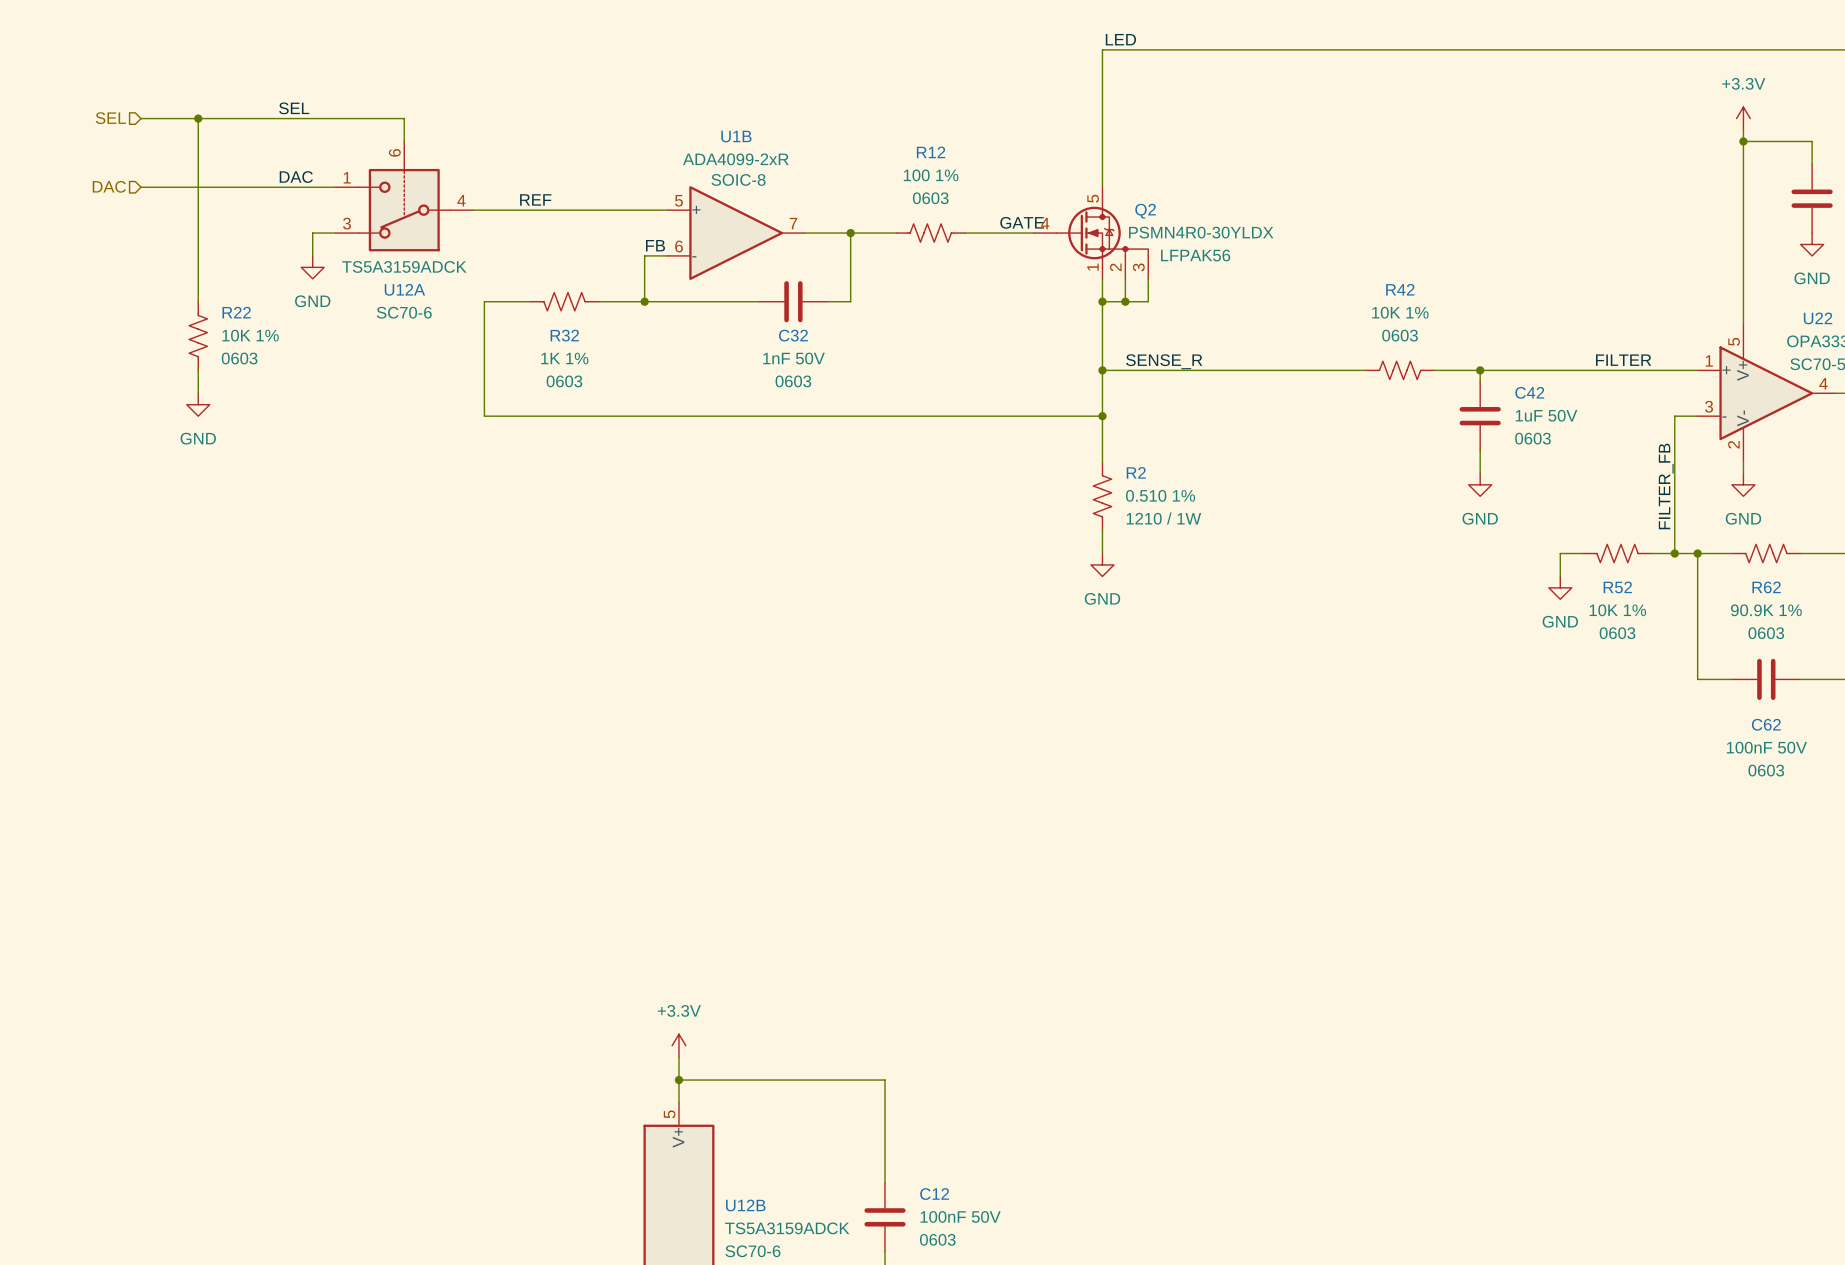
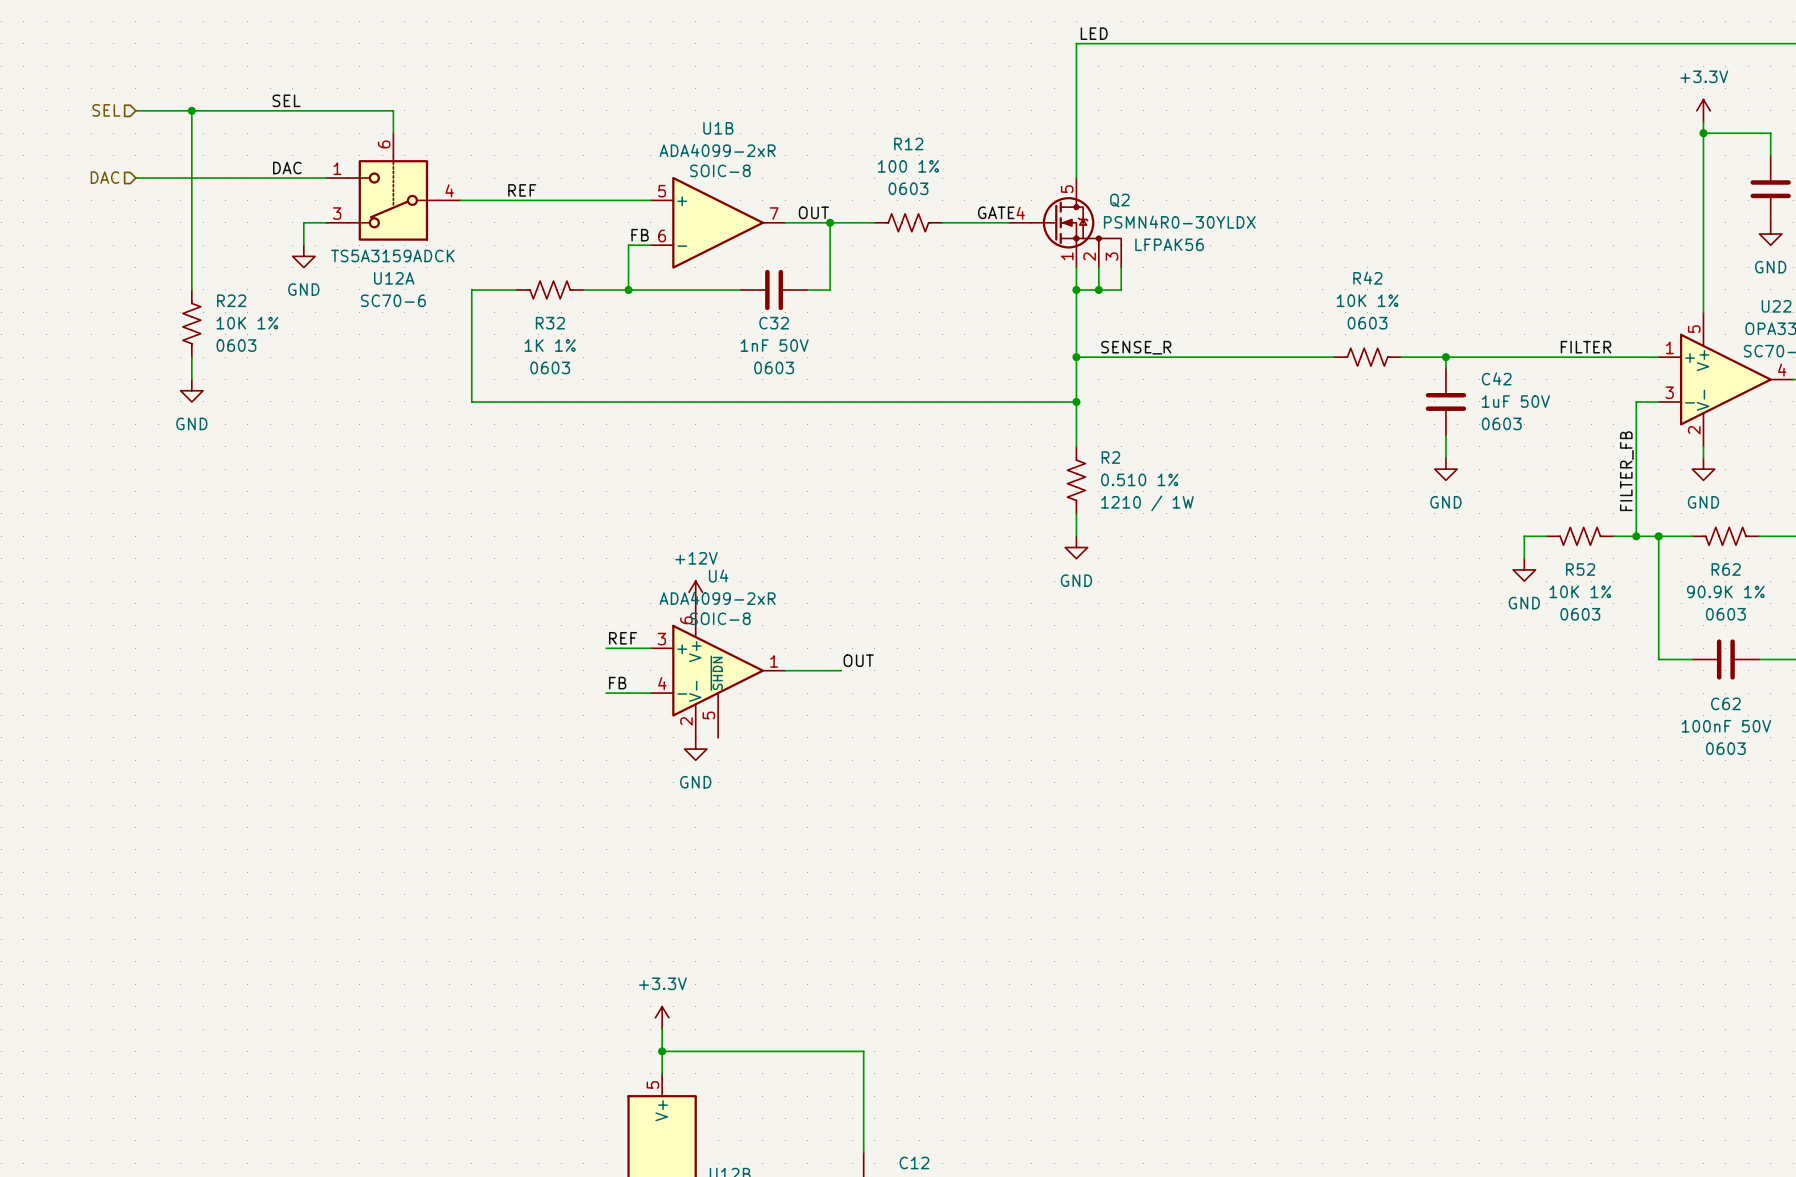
label: none -> OUT (813, 212)
power symbol: none -> +12V (695, 592)
label: none -> REF (623, 638)
wire: none -> (606, 648) (650, 648)
label: none -> OUT (858, 660)
U4: none -> ADA4099-2xR (718, 670)
wire: none -> (785, 670) (841, 670)
label: none -> FB (617, 683)
wire: none -> (606, 693) (650, 693)
power symbol: none -> GND (695, 749)

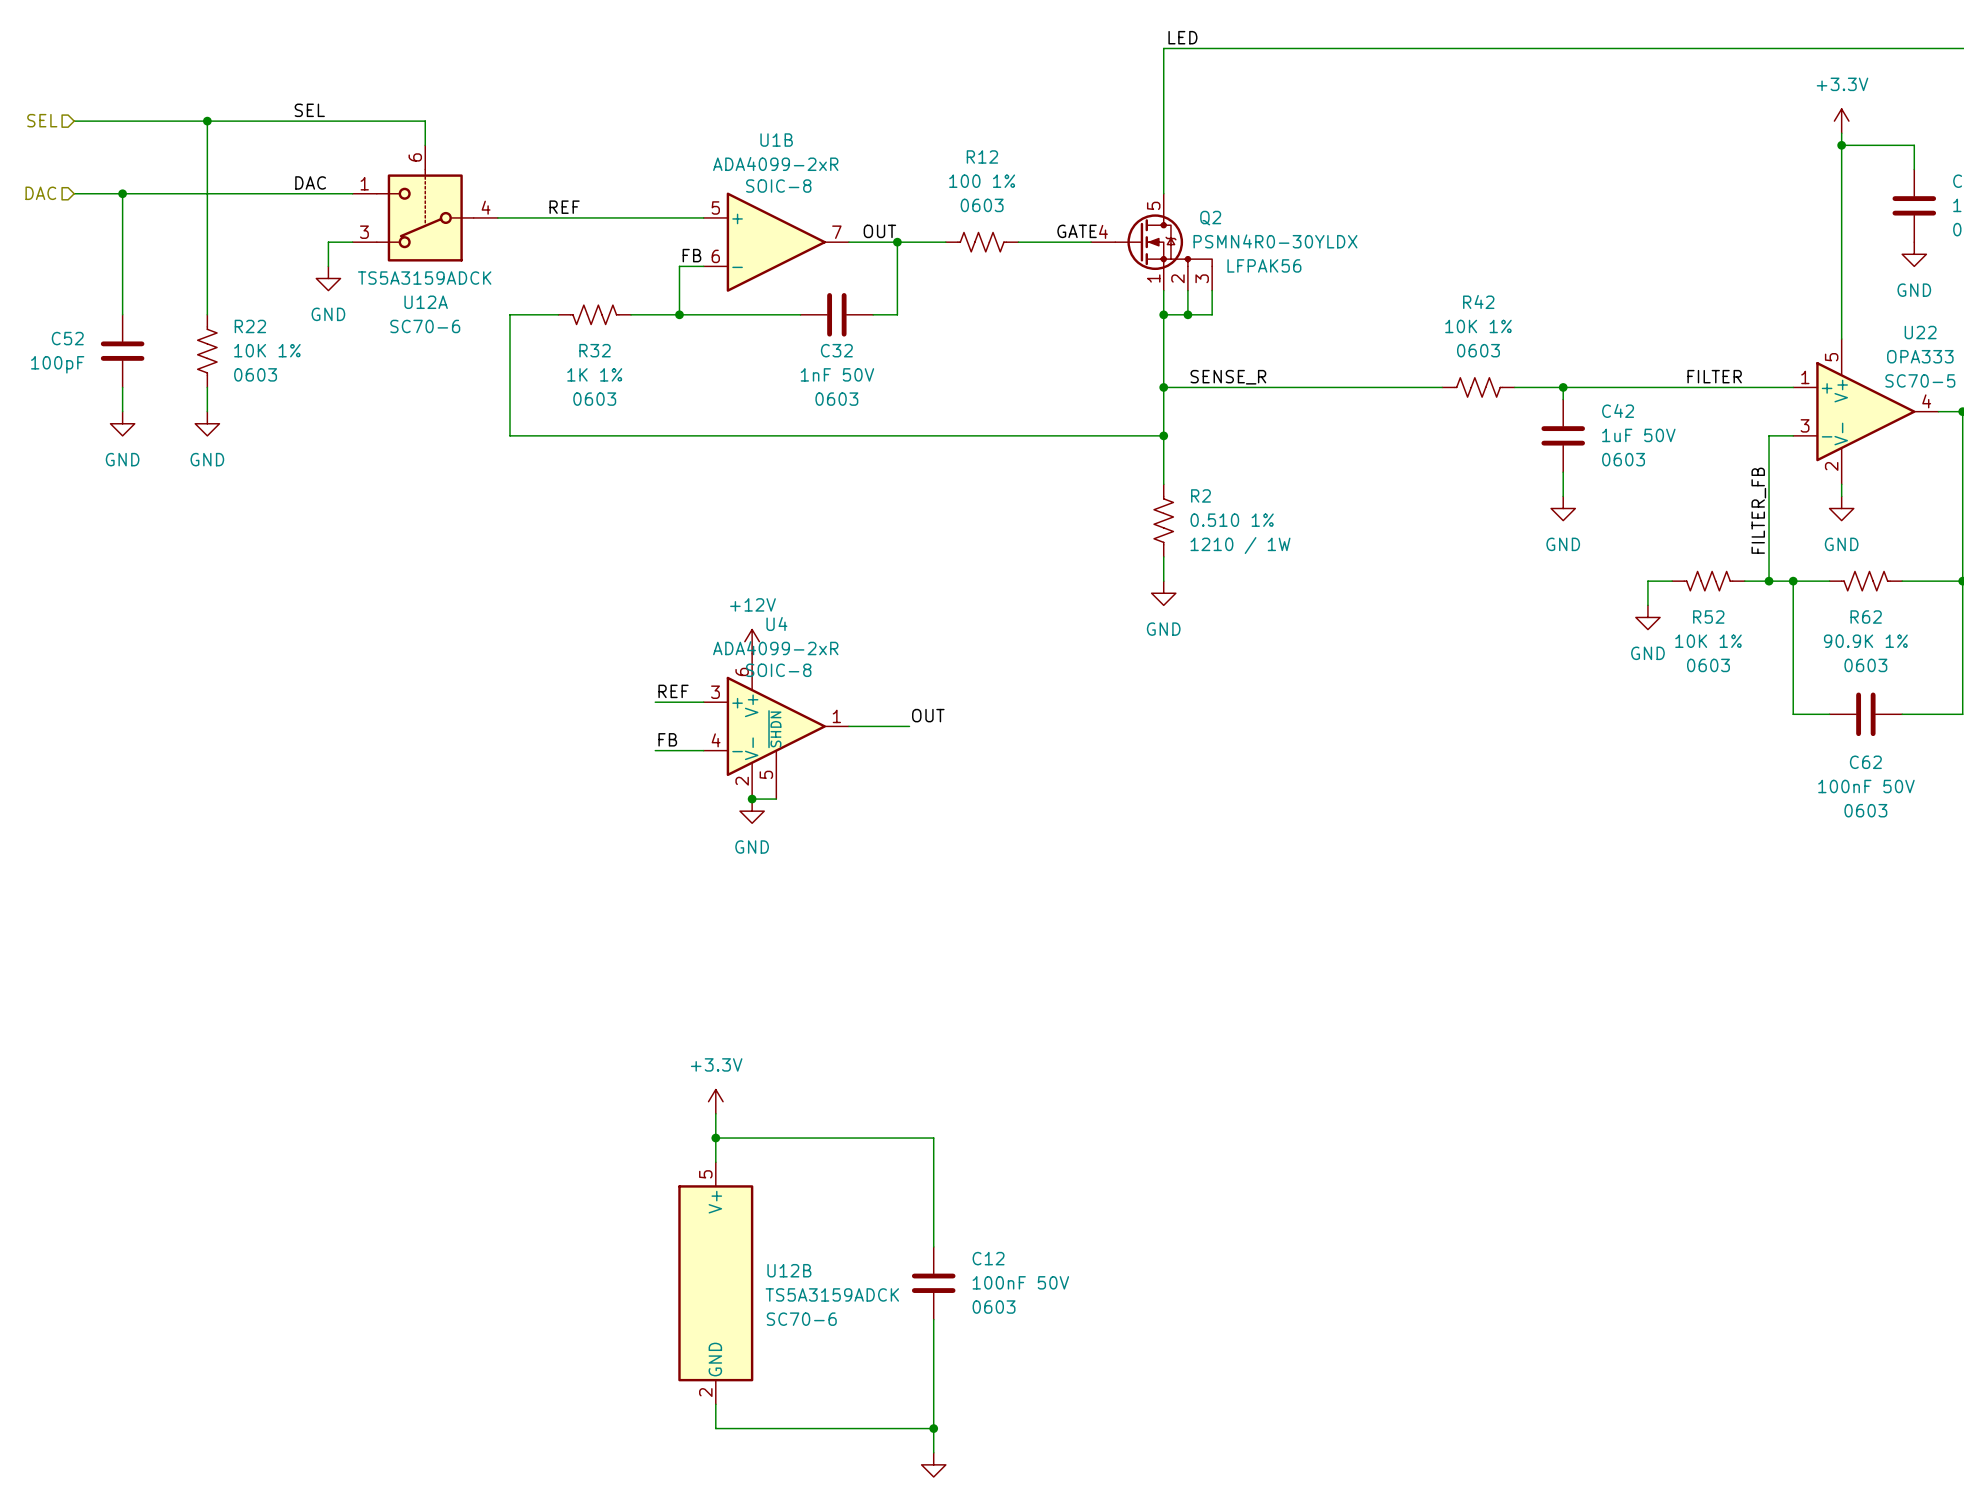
wire: none -> (74, 121) (146, 121)
hierarchical label position: SEL (106, 110) -> SEL (42, 120)
hierarchical label position: DAC (105, 177) -> DAC (40, 193)
wire: none -> (74, 193) (146, 193)
wire: none -> (122, 193) (122, 314)
junction: none -> (122, 193)
C52: none -> 100pF (122, 351)
wire: none -> (122, 387) (122, 411)
power symbol: none -> GND (122, 423)
wire: none -> (752, 799) (776, 799)
junction: none -> (752, 799)

